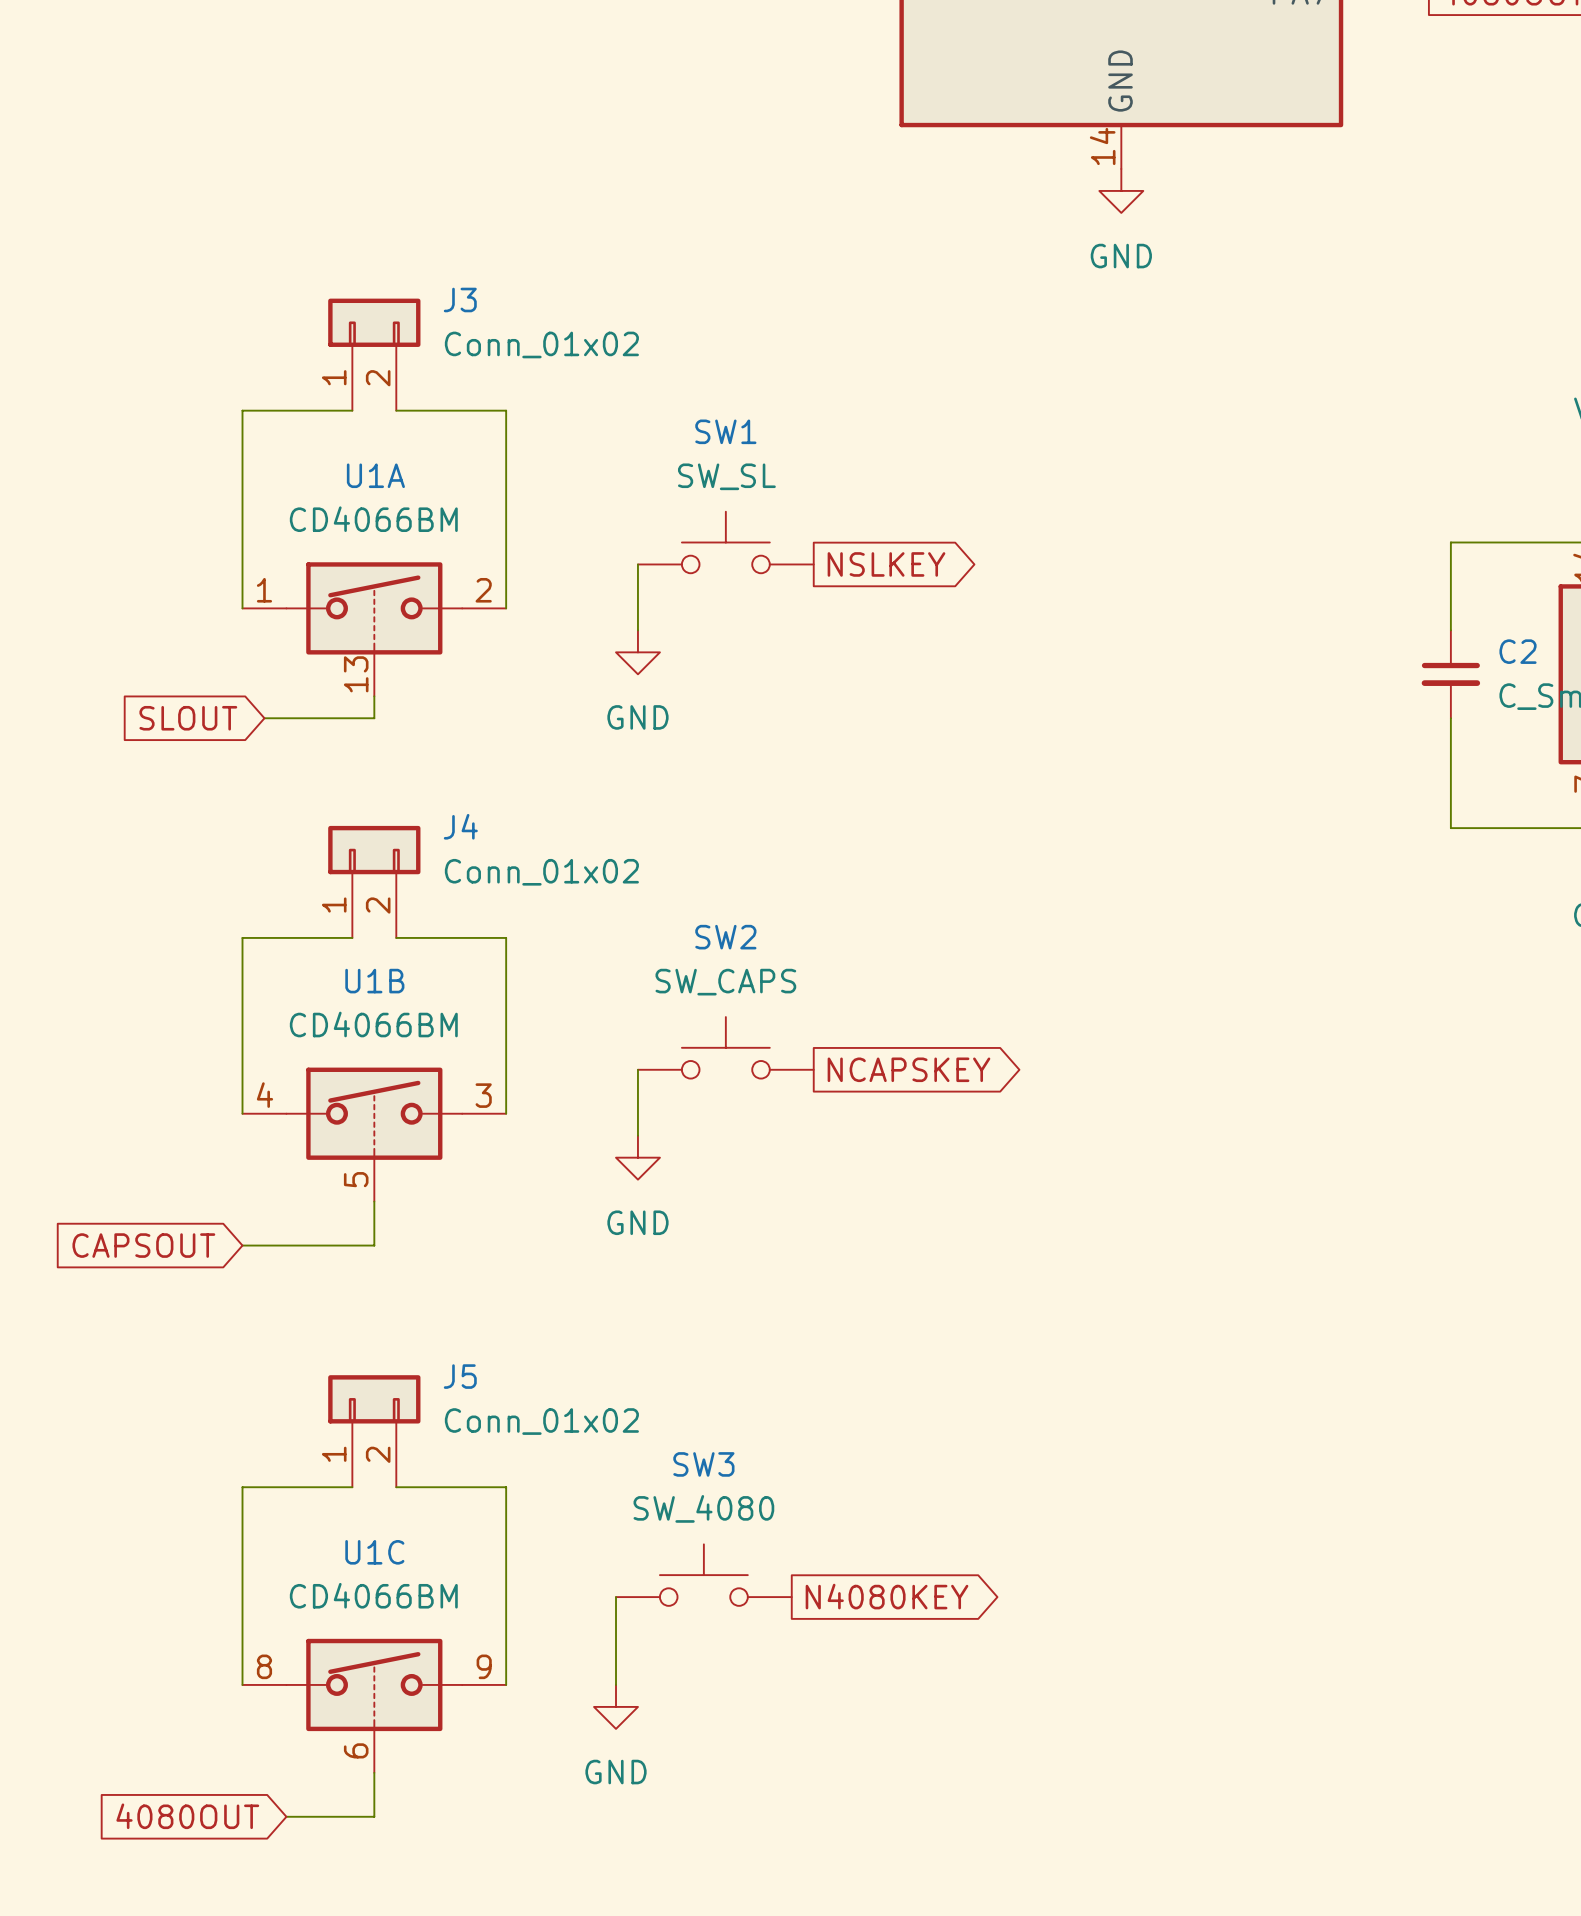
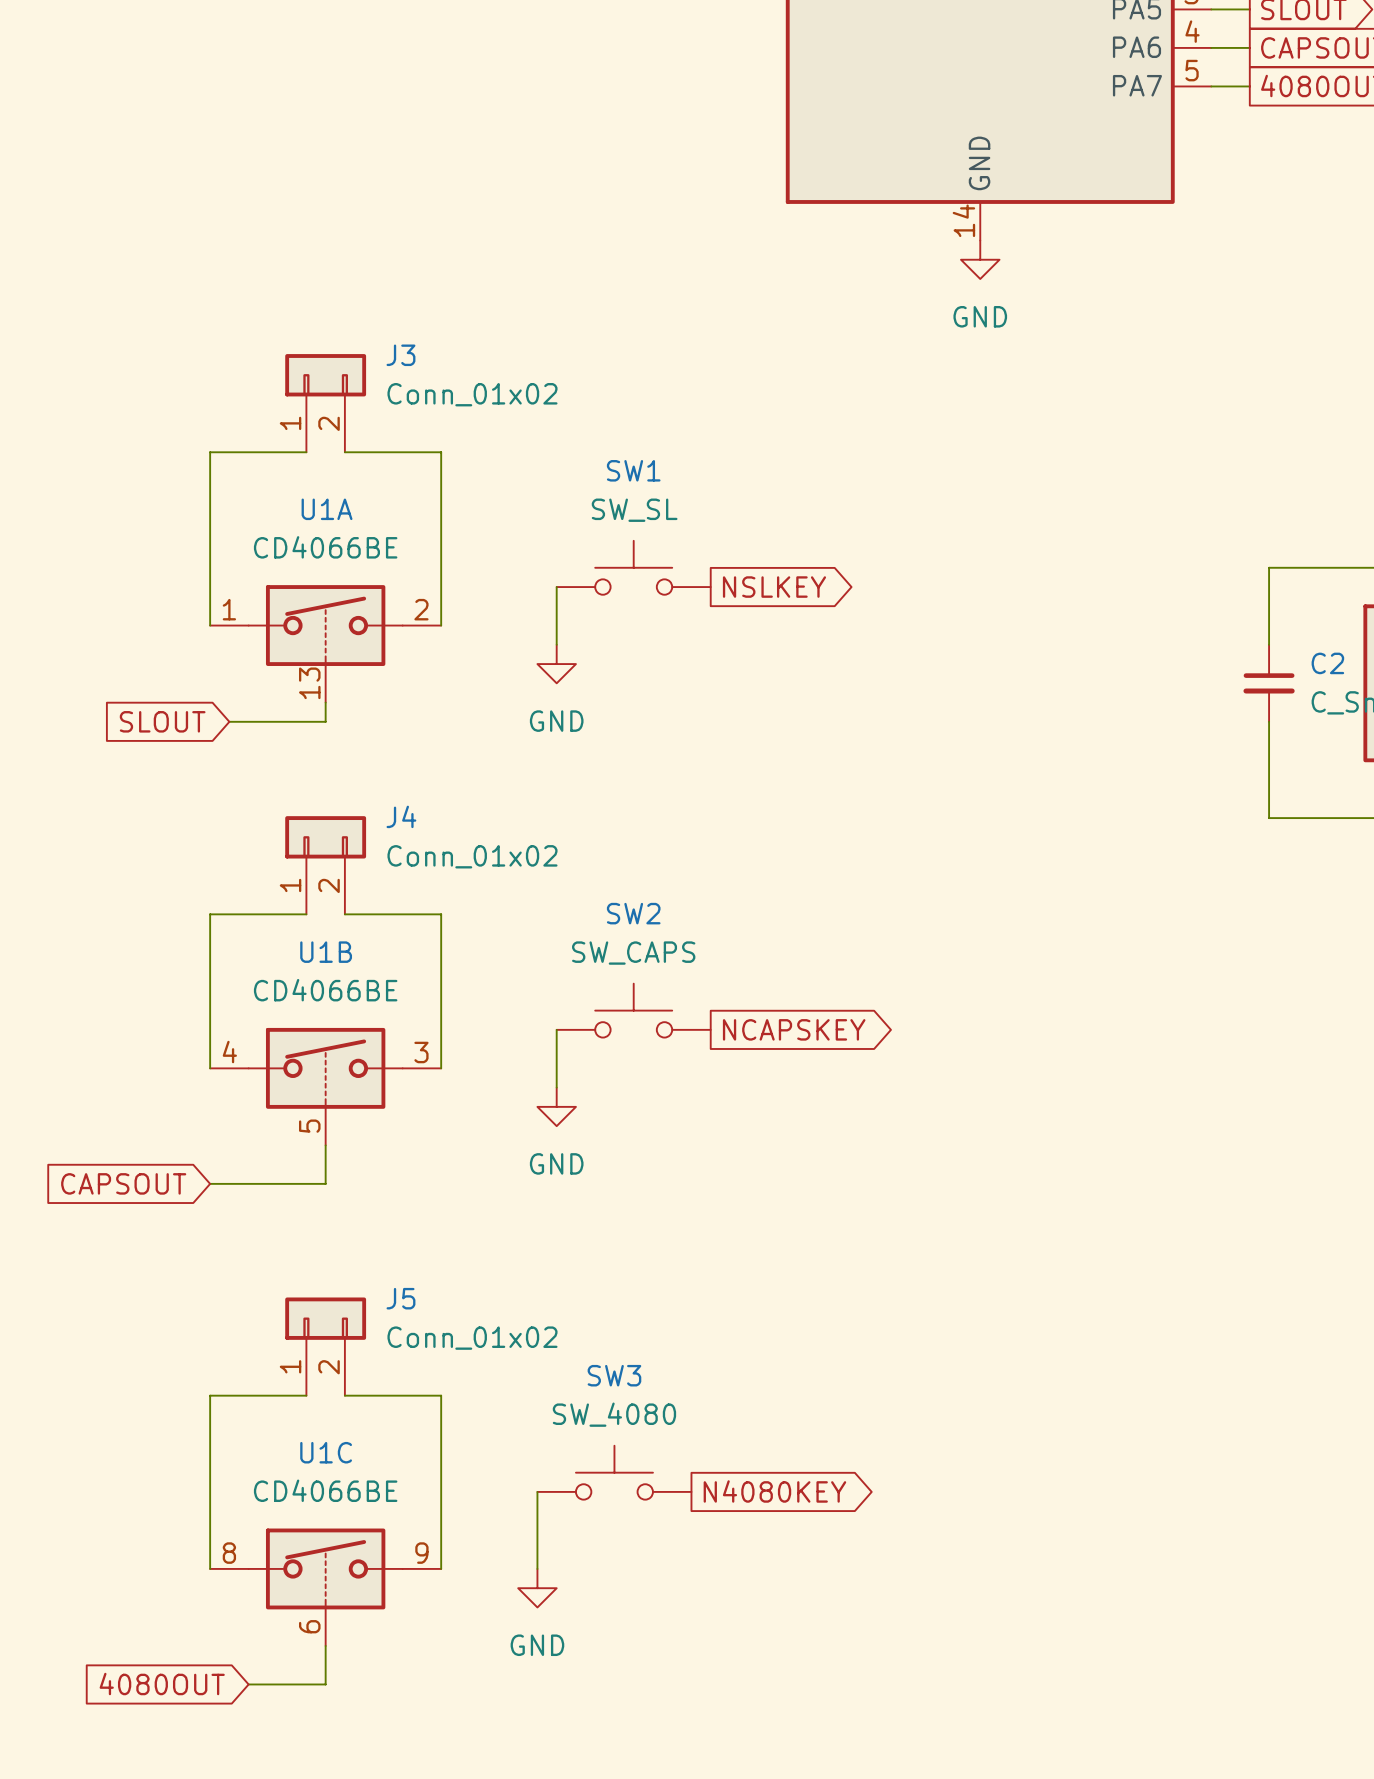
U1A value: CD4066BM (373, 519) -> CD4066BE (325, 547)
U1B value: CD4066BM (373, 1024) -> CD4066BE (325, 990)
U1C value: CD4066BM (373, 1595) -> CD4066BE (325, 1490)

